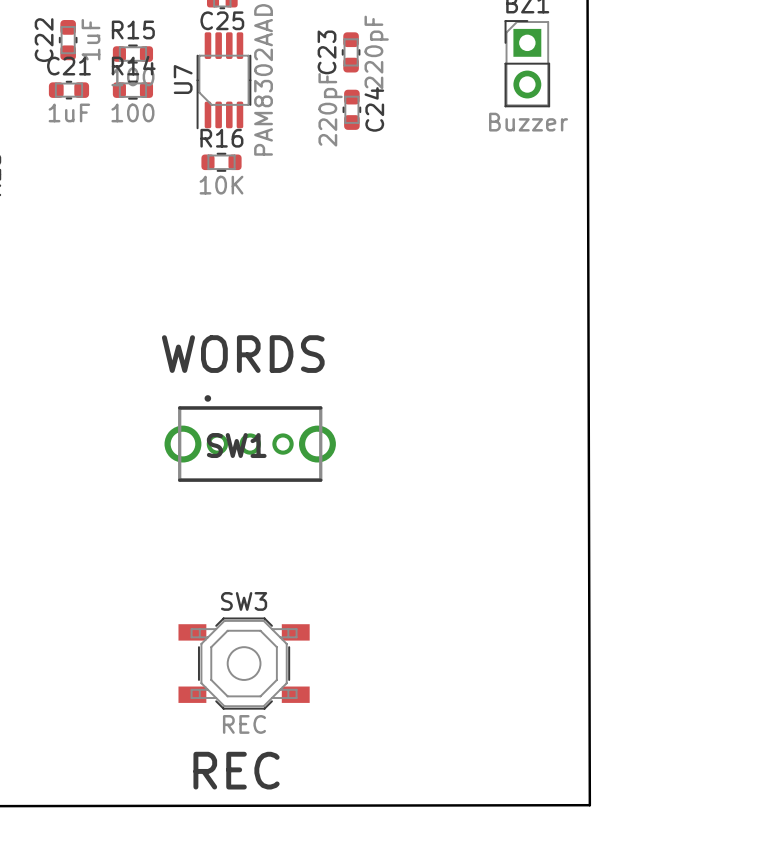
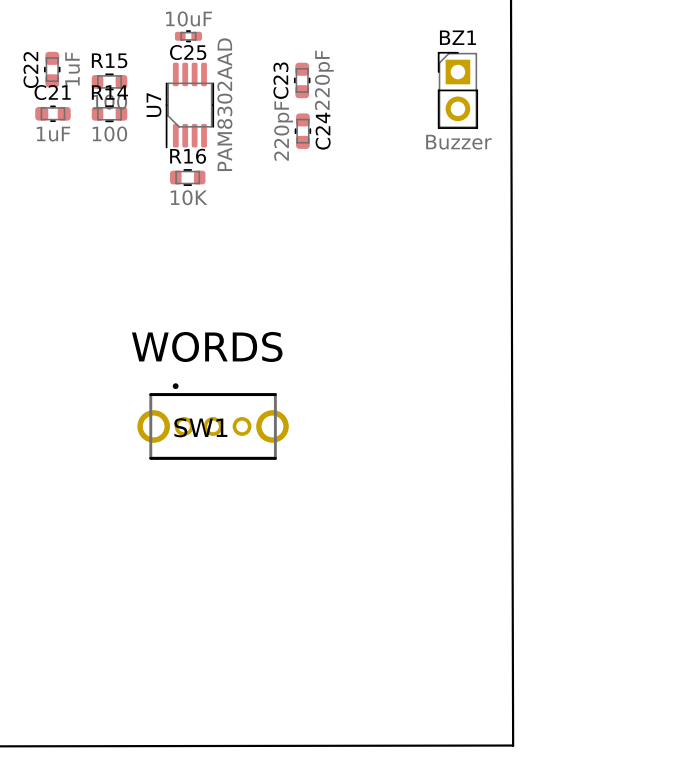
SW3: REC (244, 663) -> none
text: REC (236, 770) -> none

